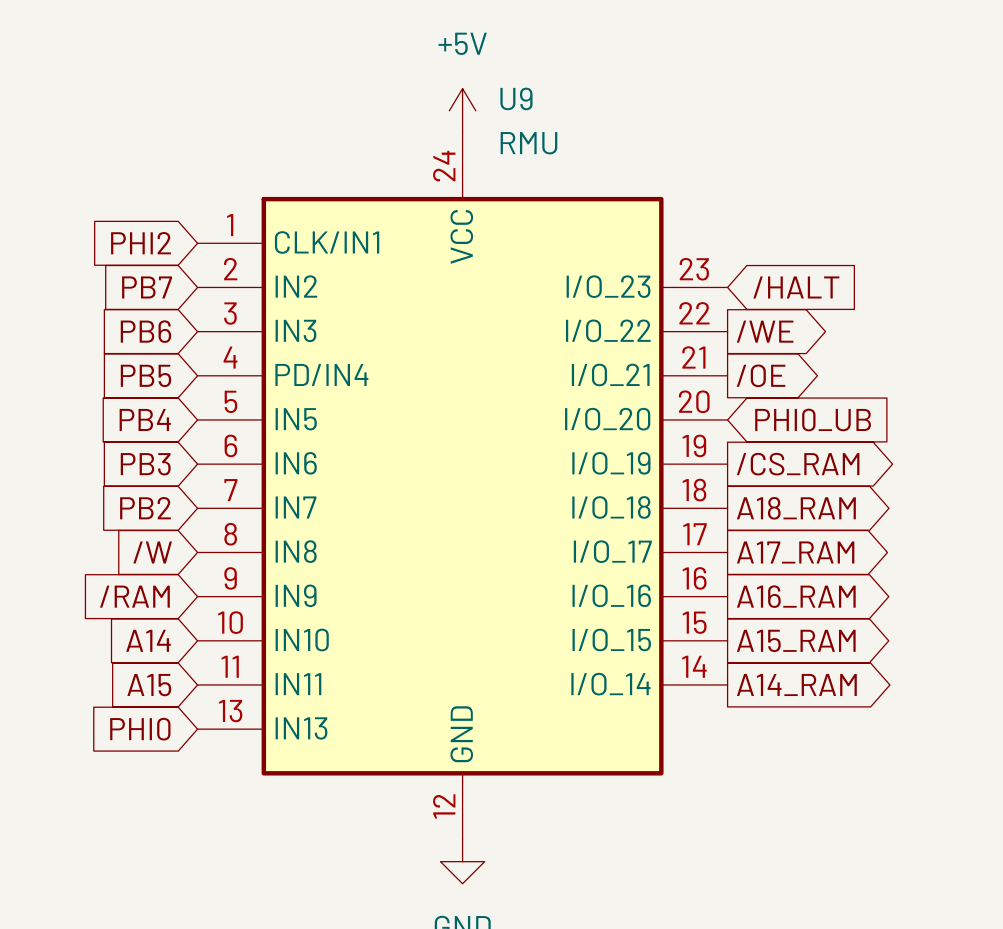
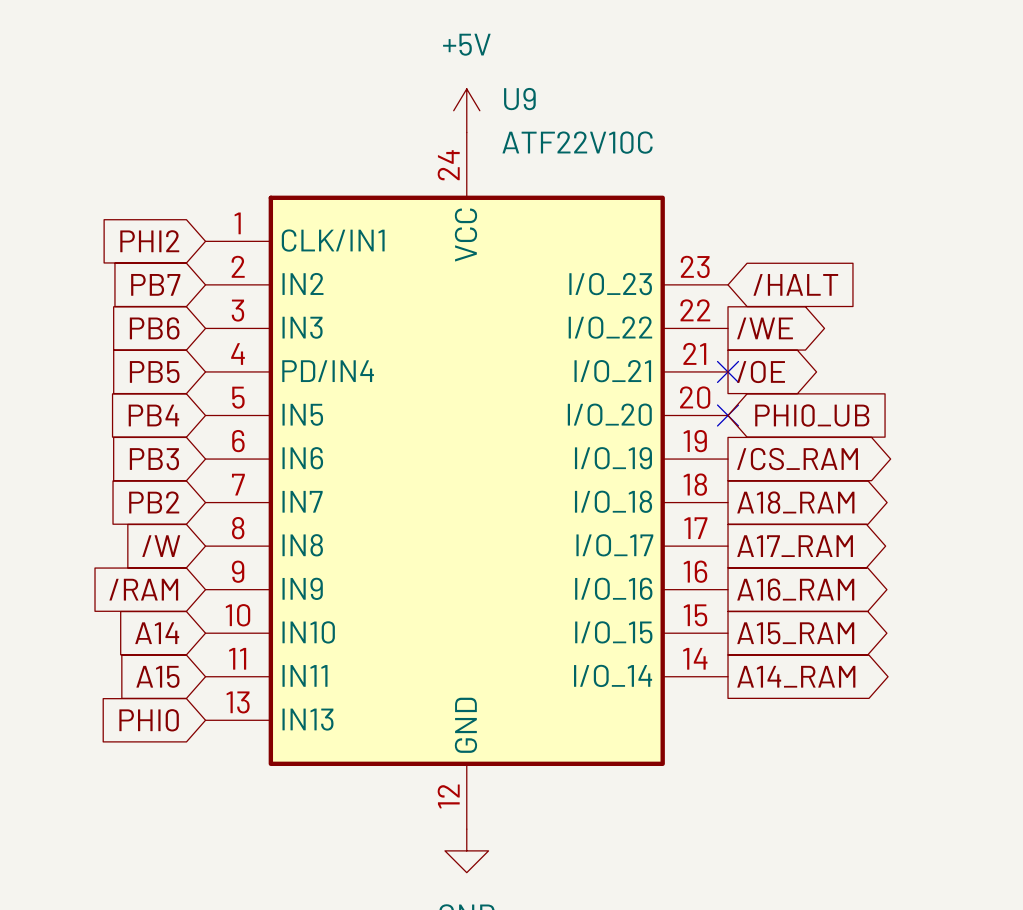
U9 value: RMU (528, 143) -> ATF22V10C (577, 142)
no-connect mark: none -> (728, 371)
no-connect mark: none -> (728, 415)

